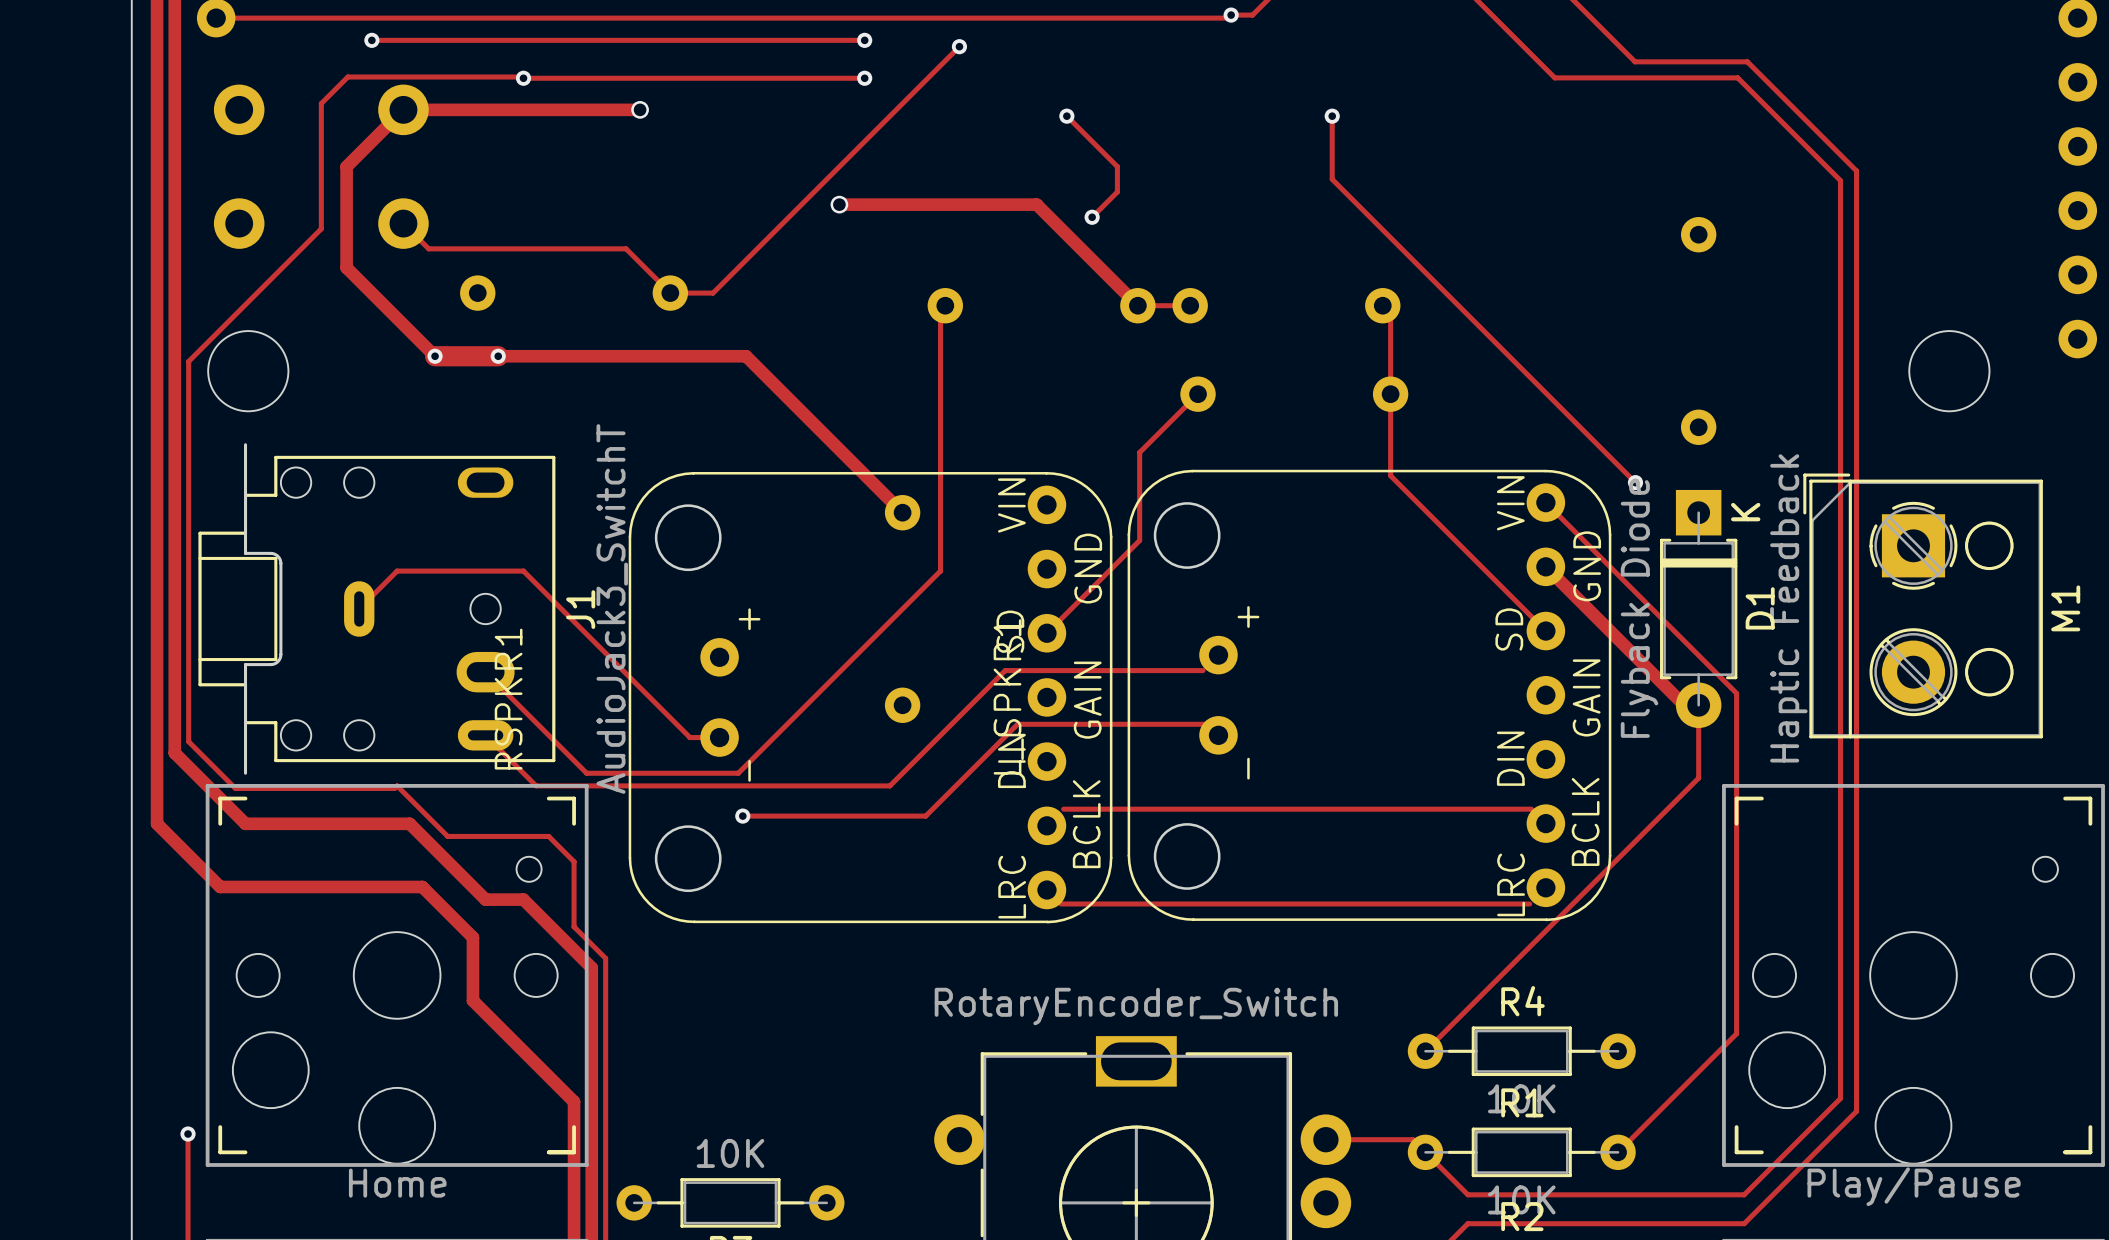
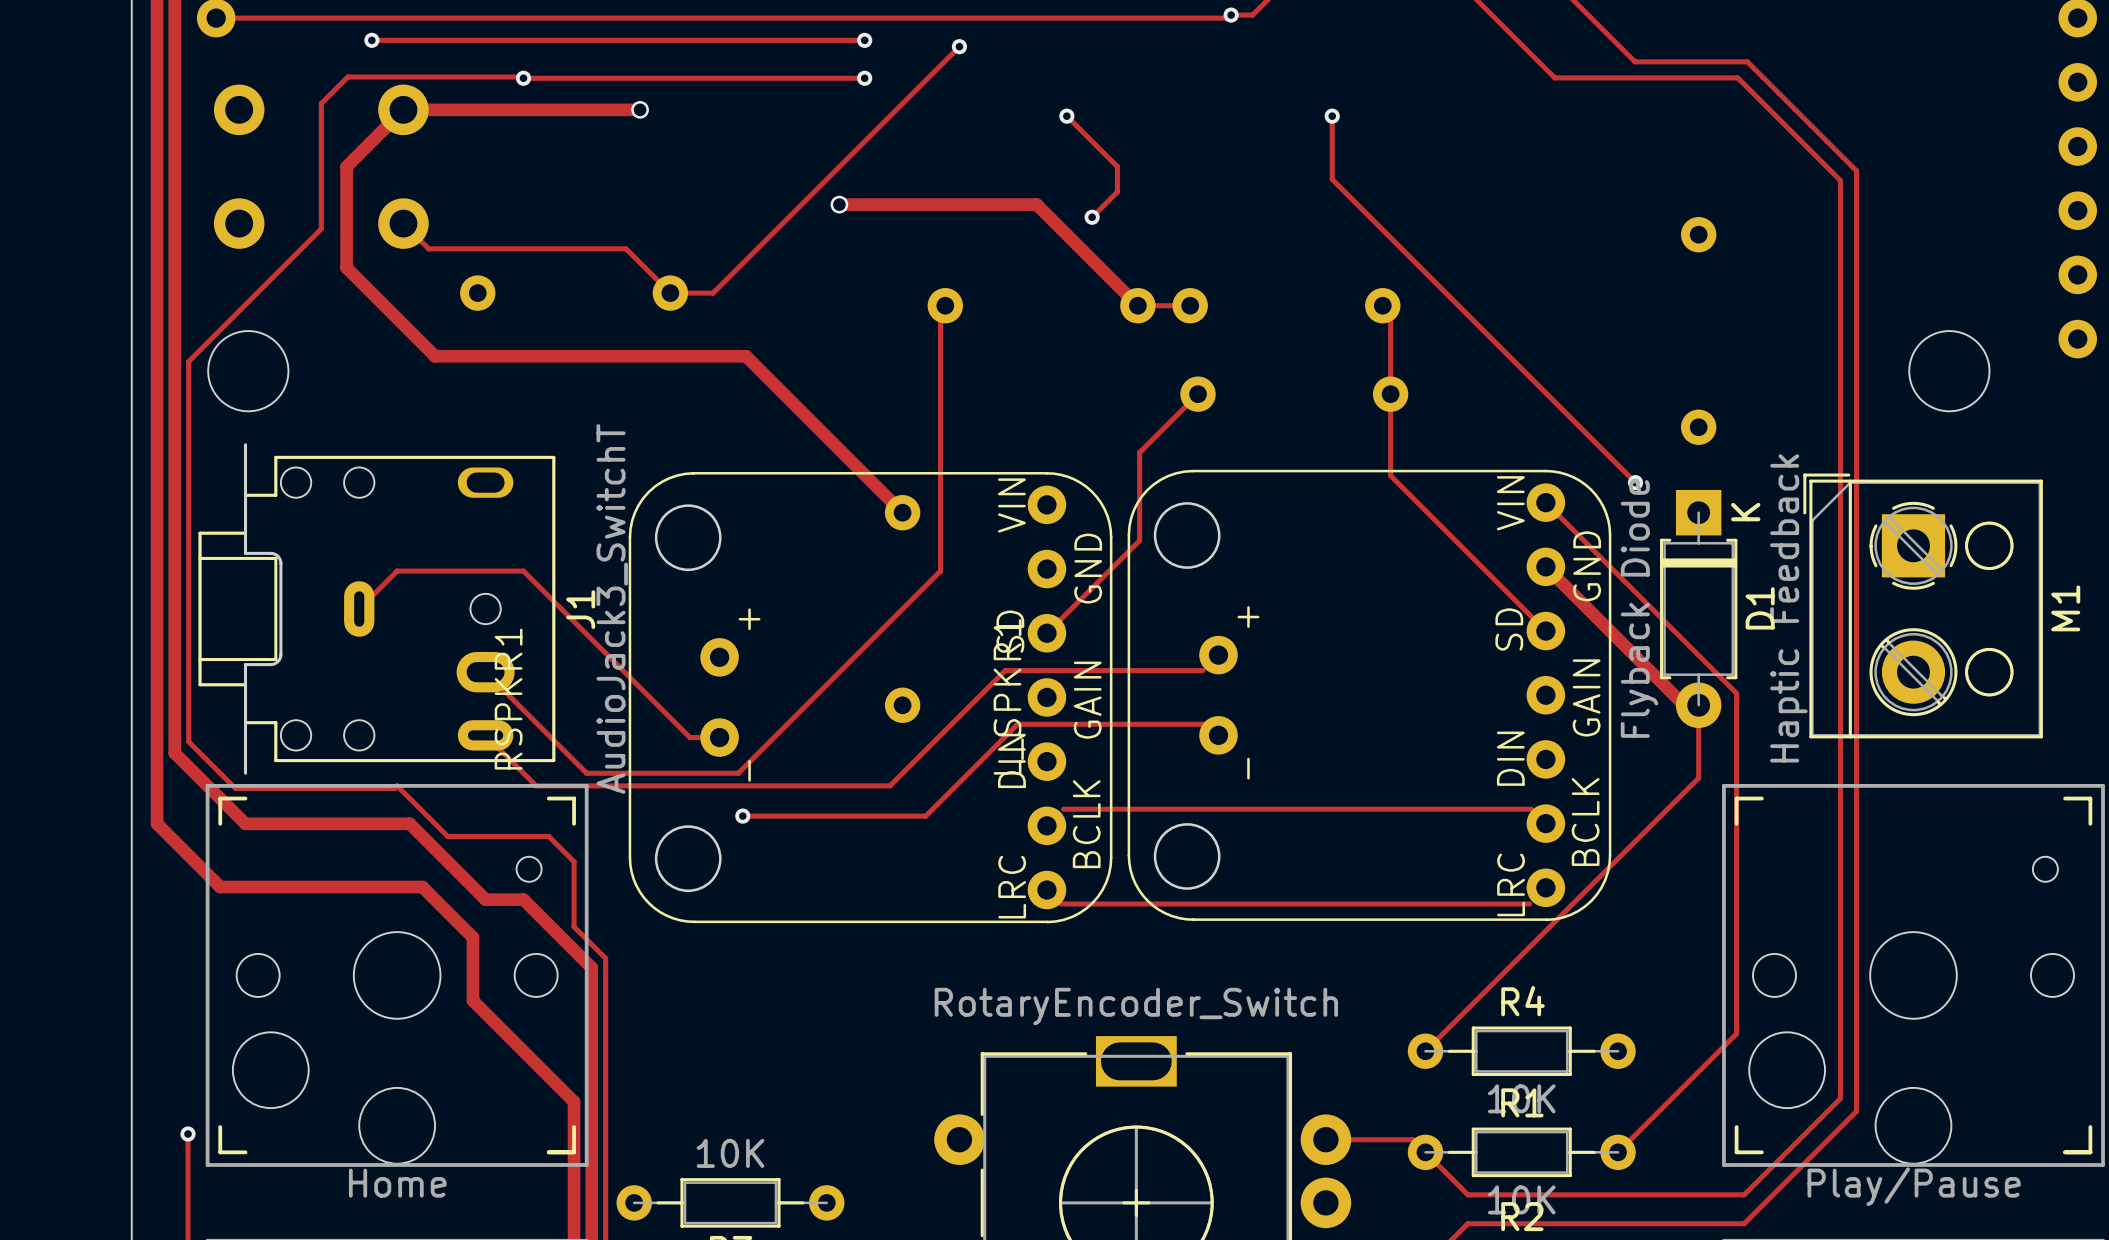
track width: thick (435, 356) (498, 356) -> thin (435, 356) (498, 356)
via: (435, 356) -> none
via: (498, 356) -> none

